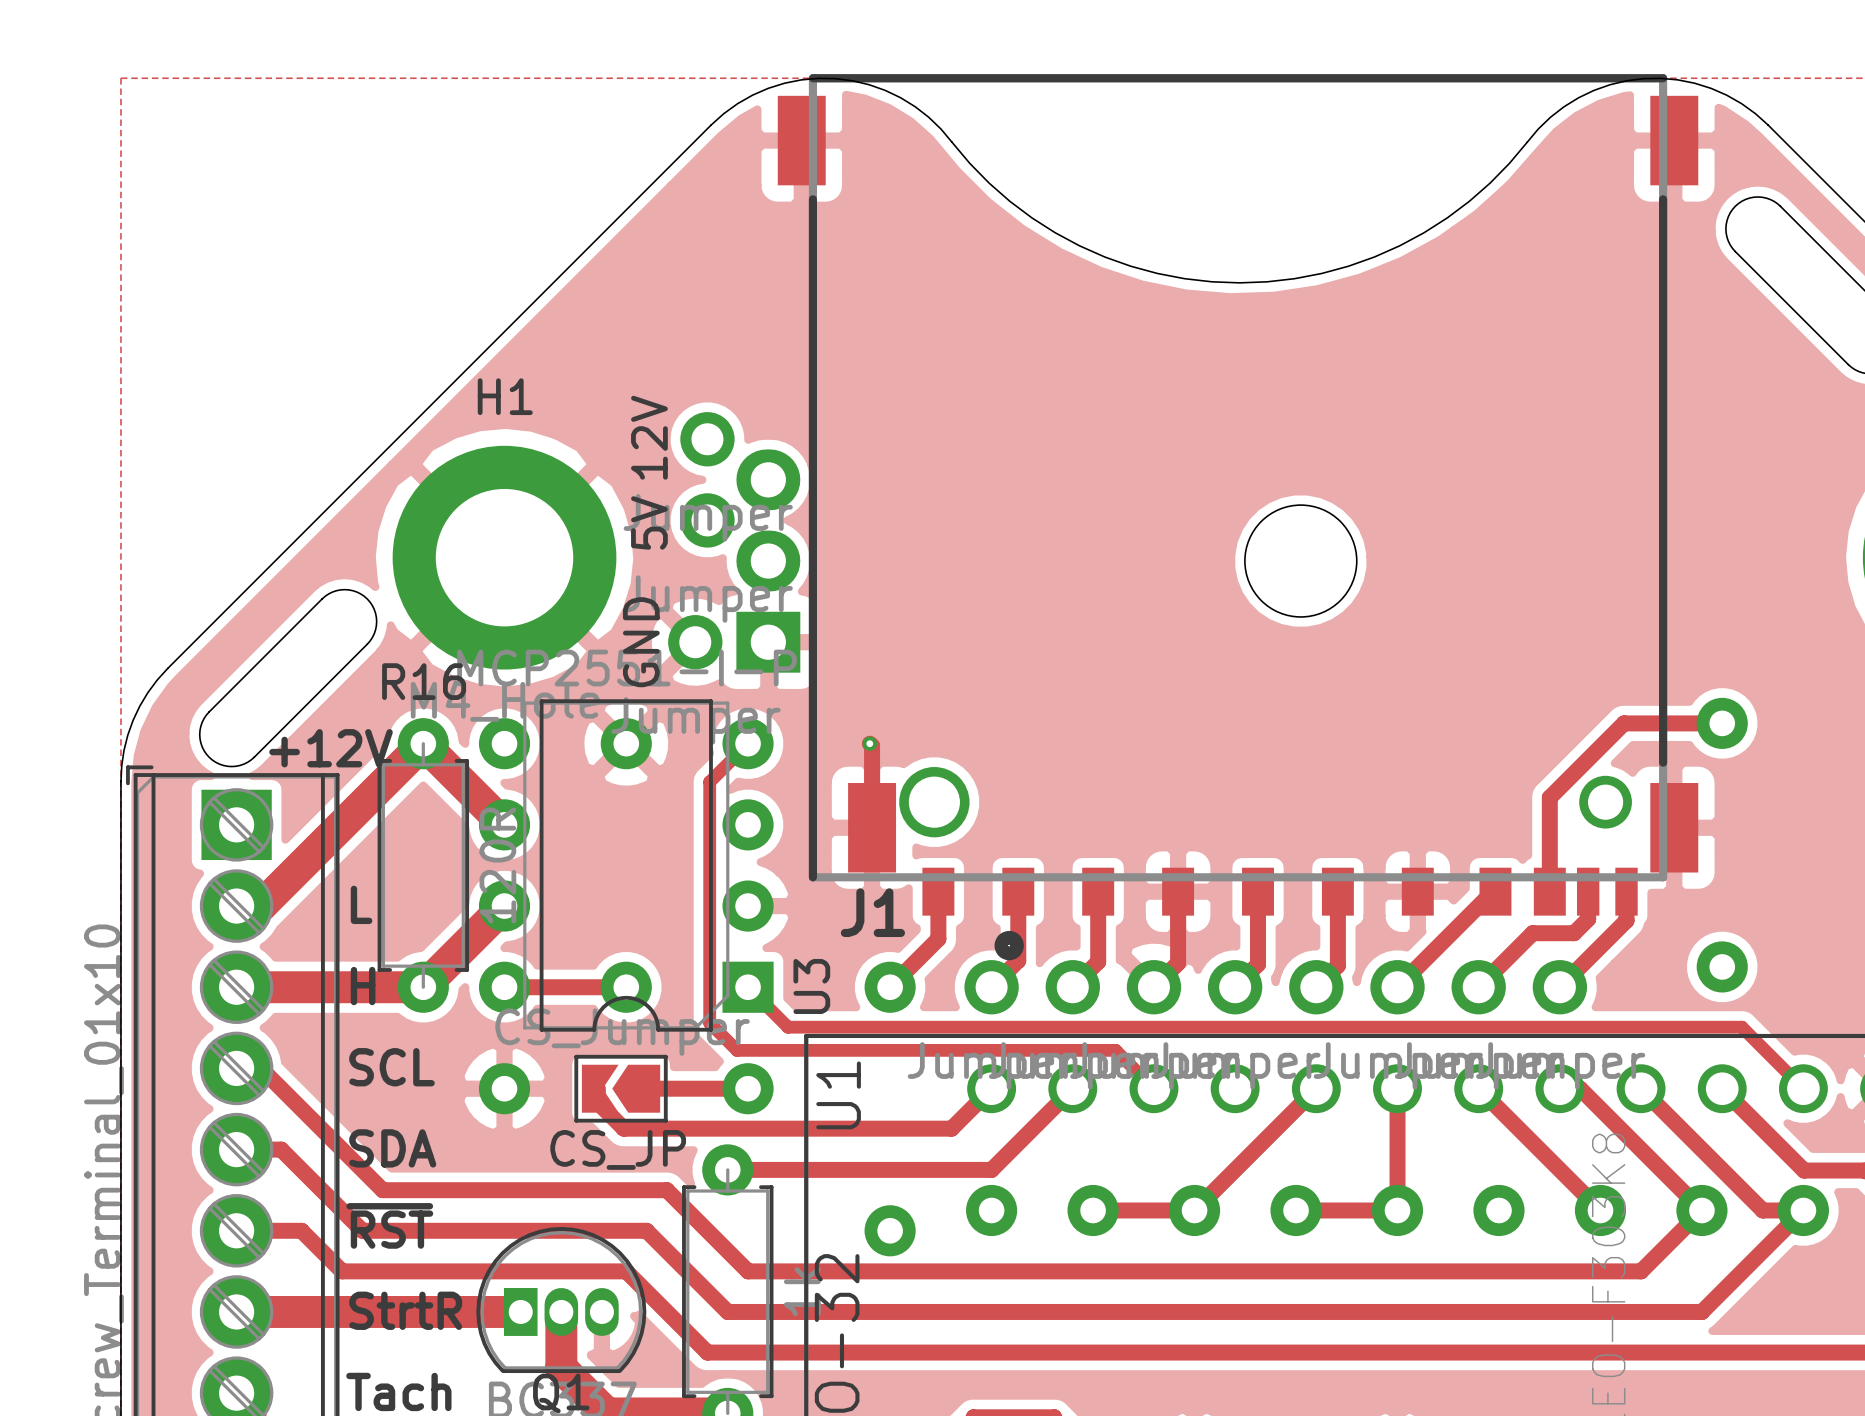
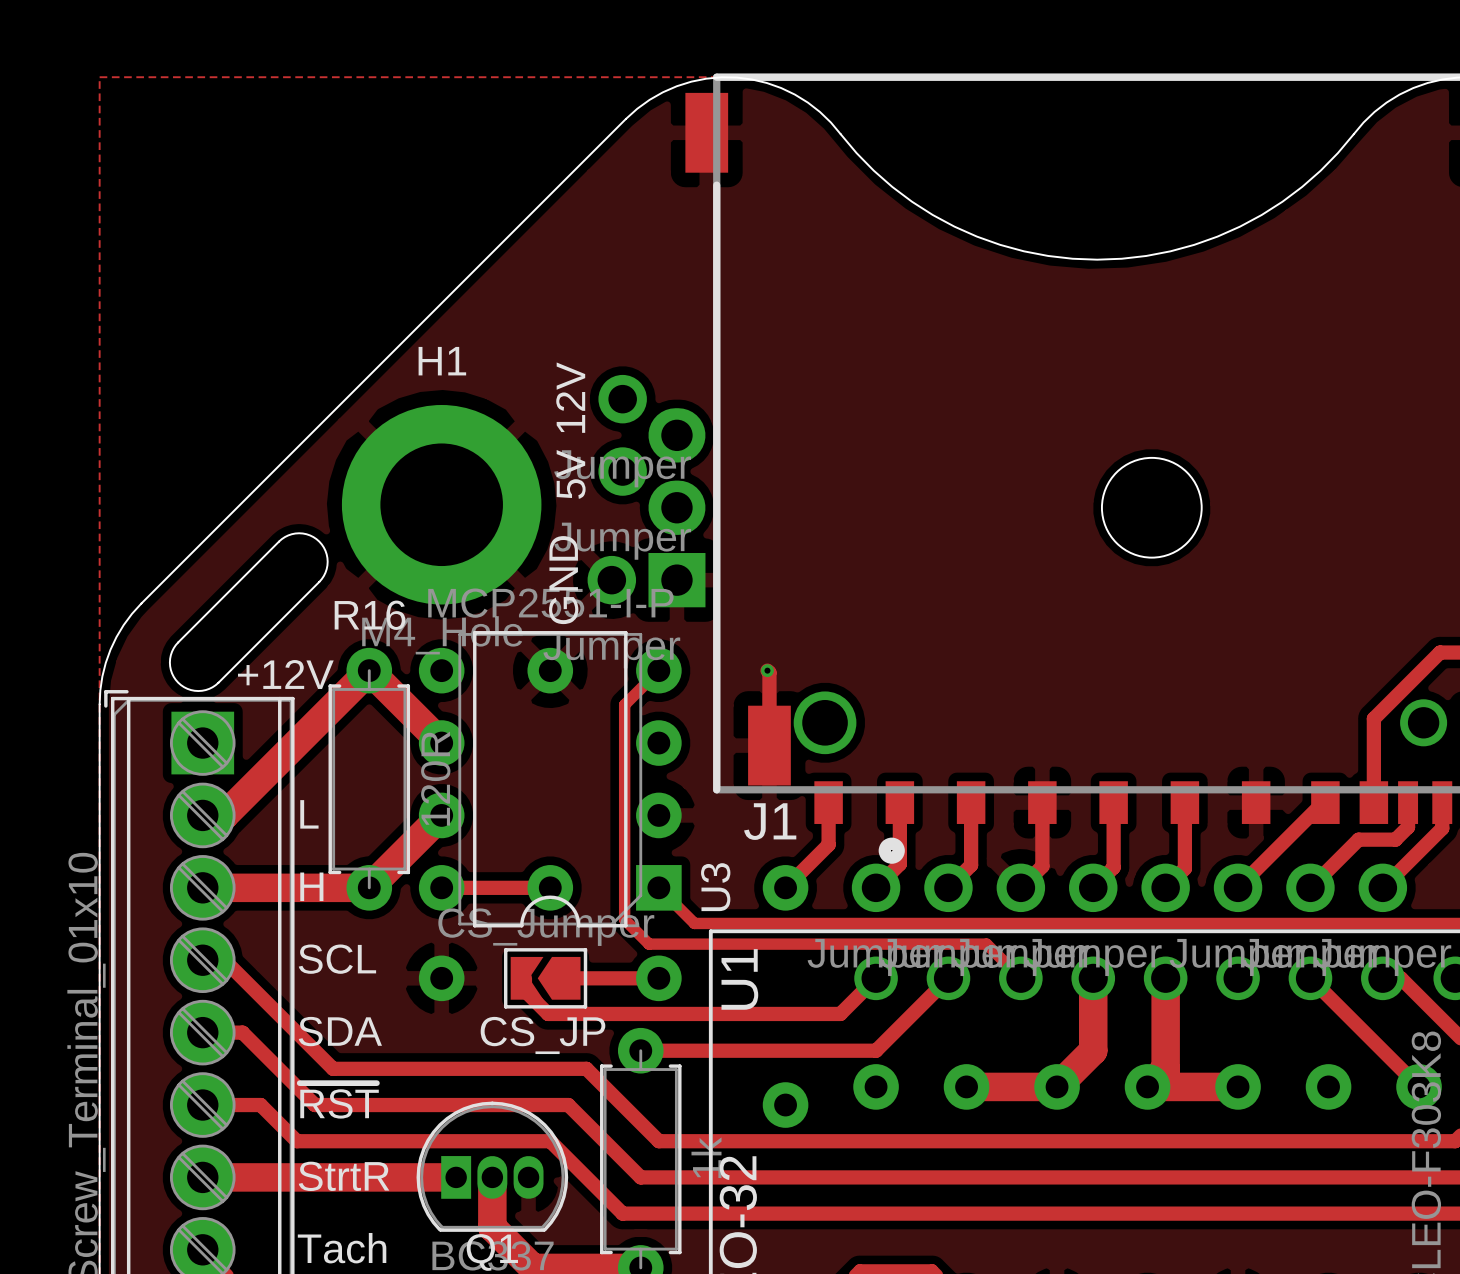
track: none -> (1093, 978) (1093, 1050)
track: (1316, 1088) (1235, 1169) -> (1165, 978) (1165, 1068) (1147, 1086)
track: (1397, 1088) (1397, 1210) -> none
track width: thin (1235, 1169) (1194, 1210) (1093, 1210) -> thick (1093, 1050) (1057, 1086) (966, 1086)
track width: thin (1296, 1210) (1397, 1210) -> thick (1147, 1086) (1238, 1086)

